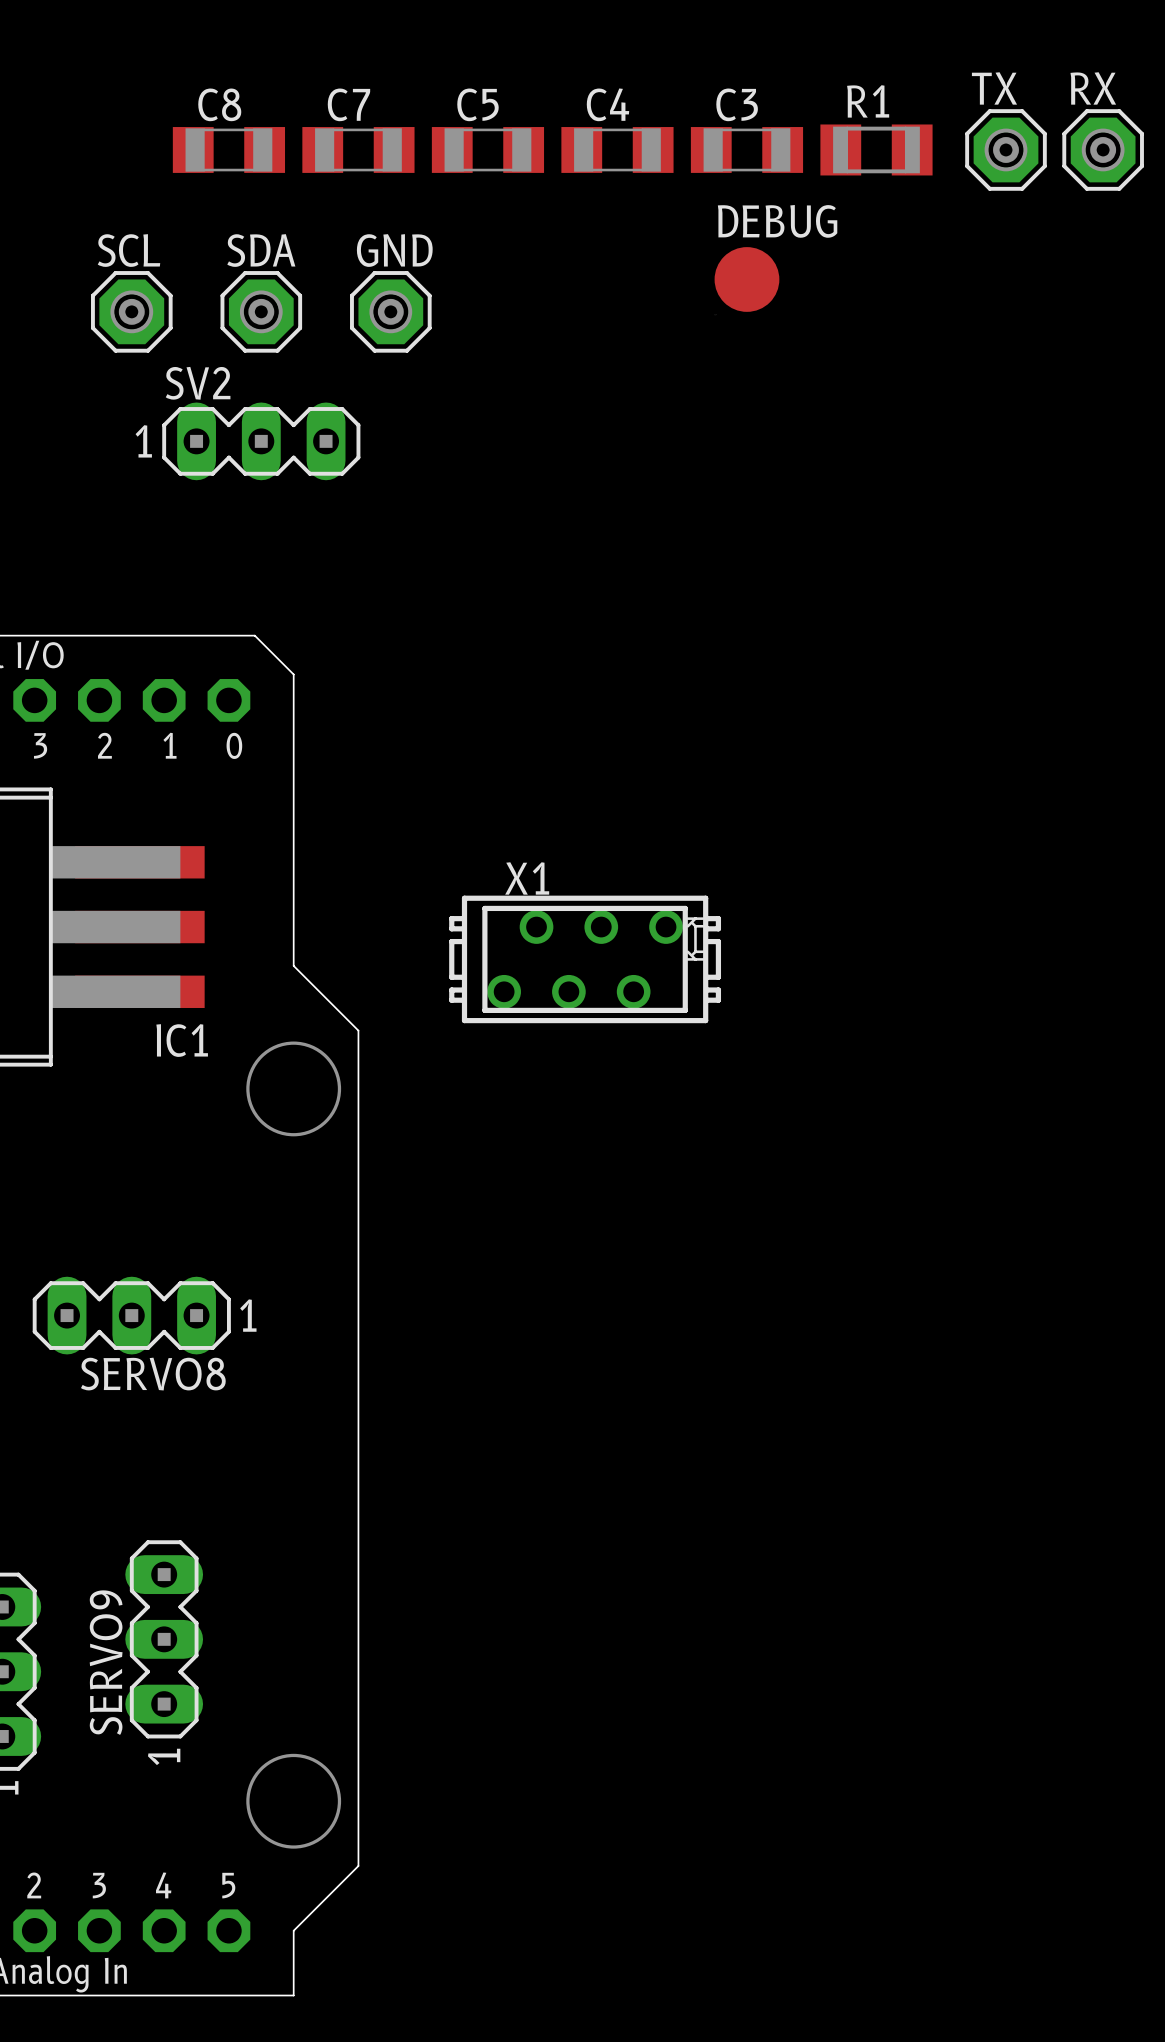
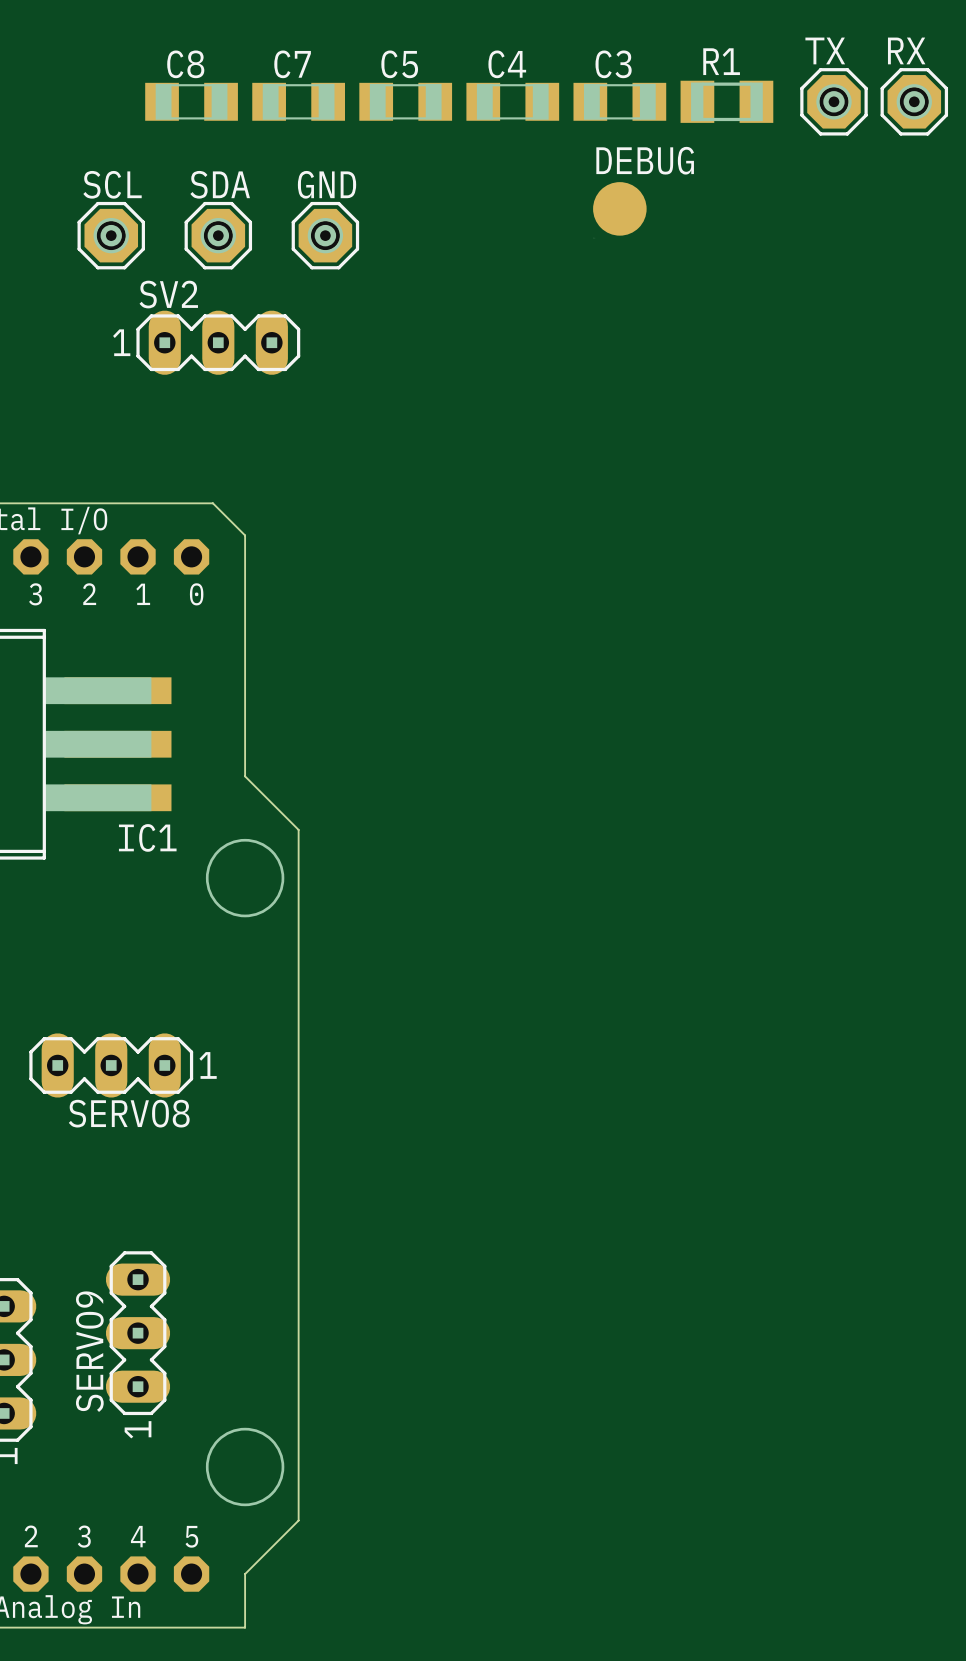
X1: (585, 959) -> none

